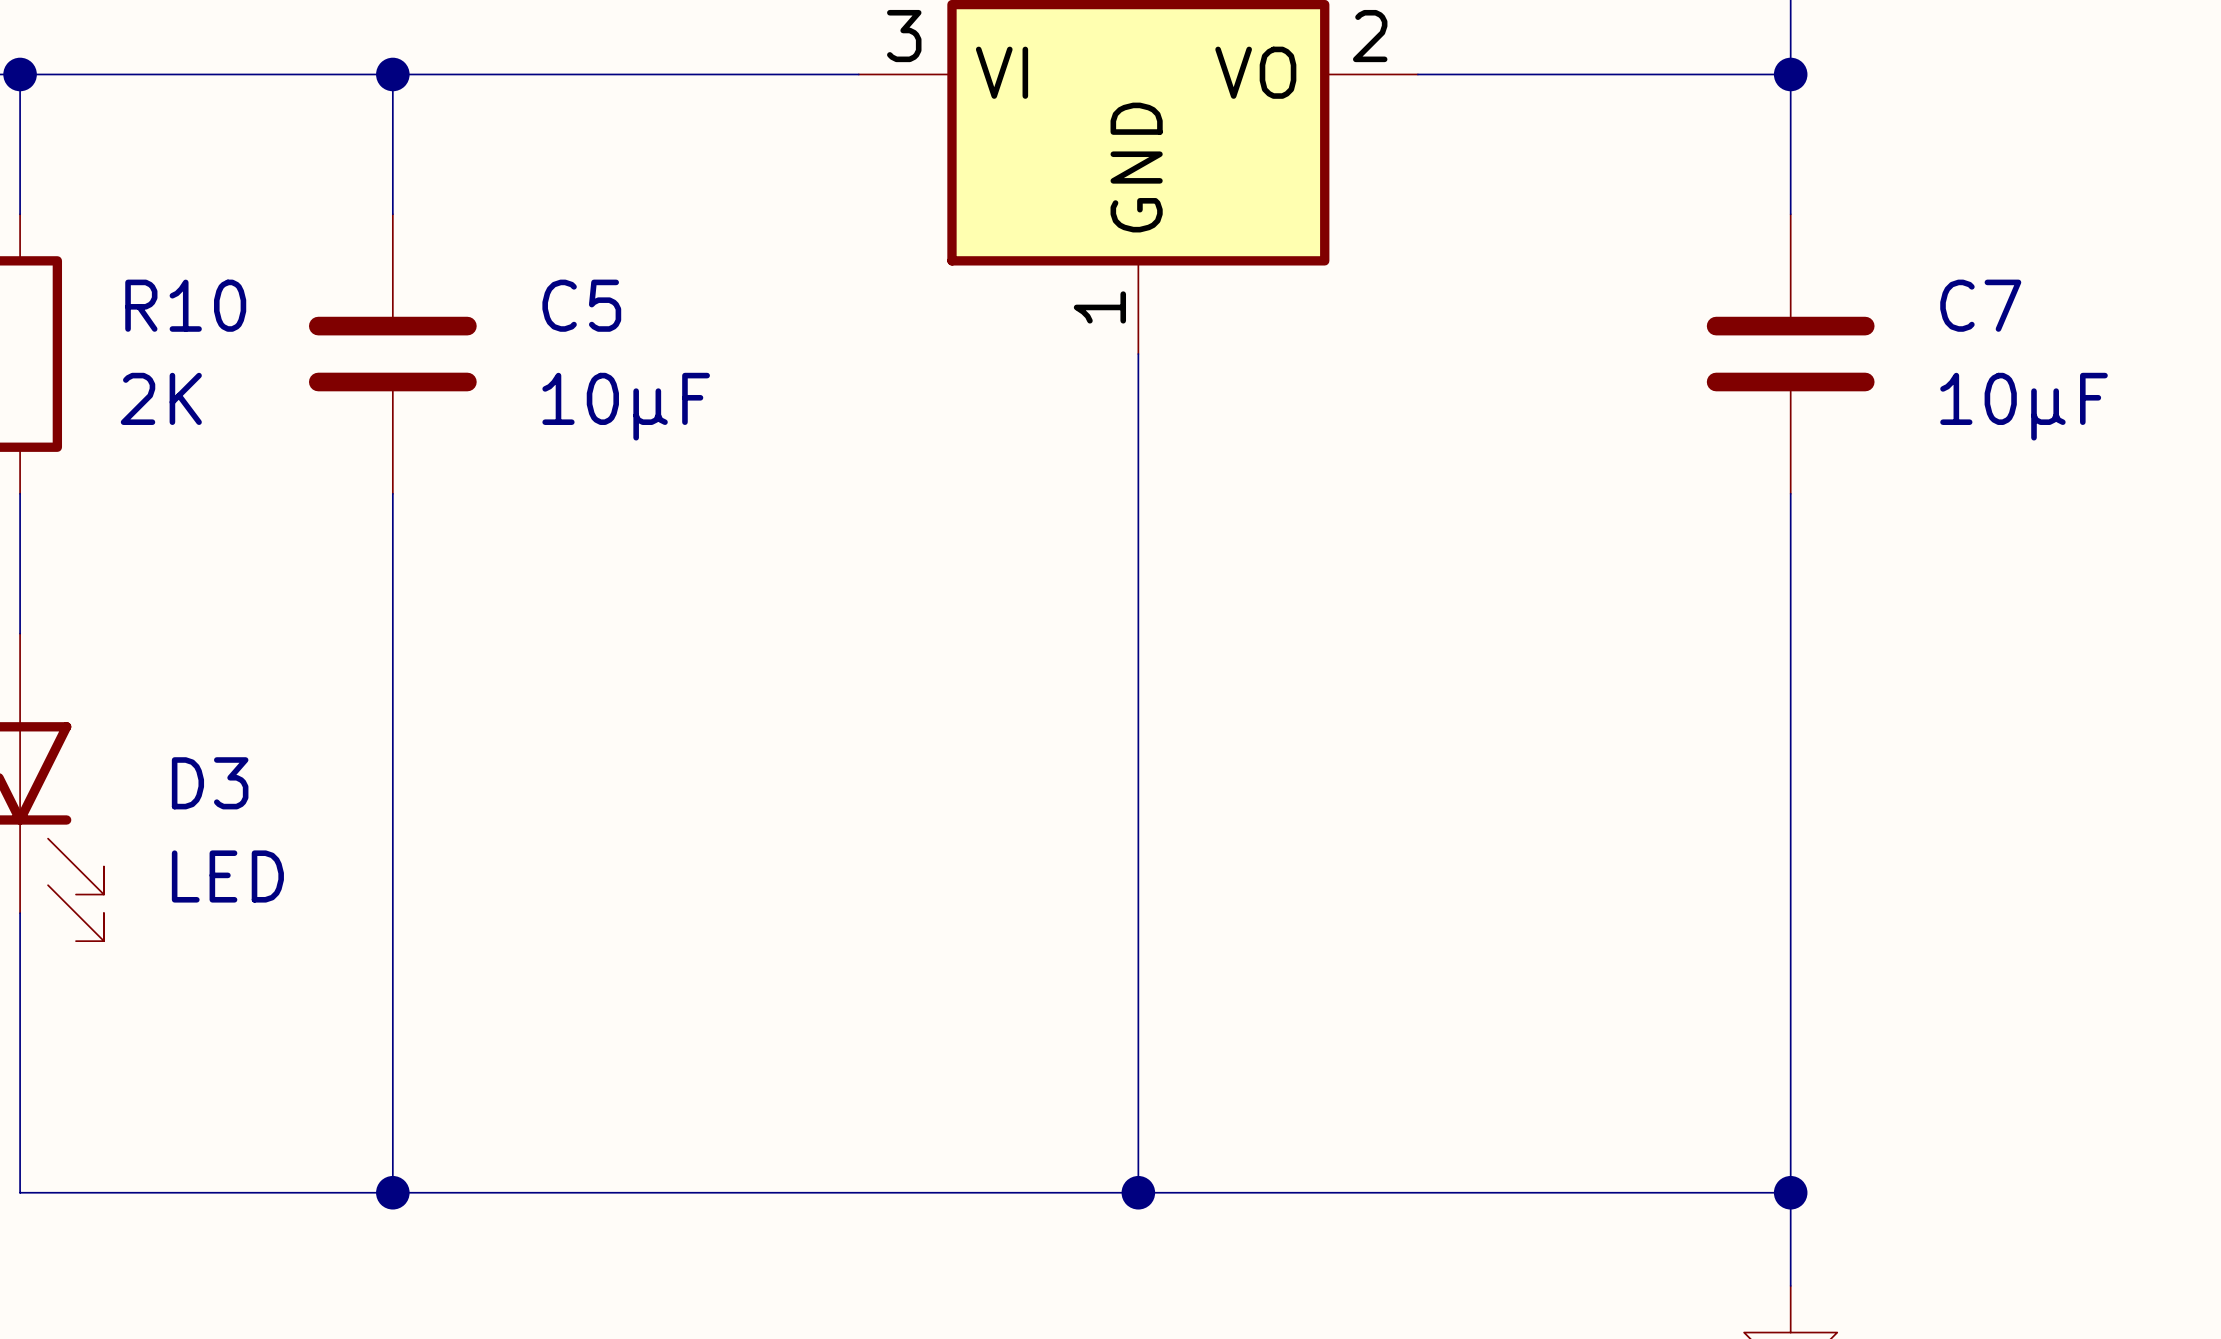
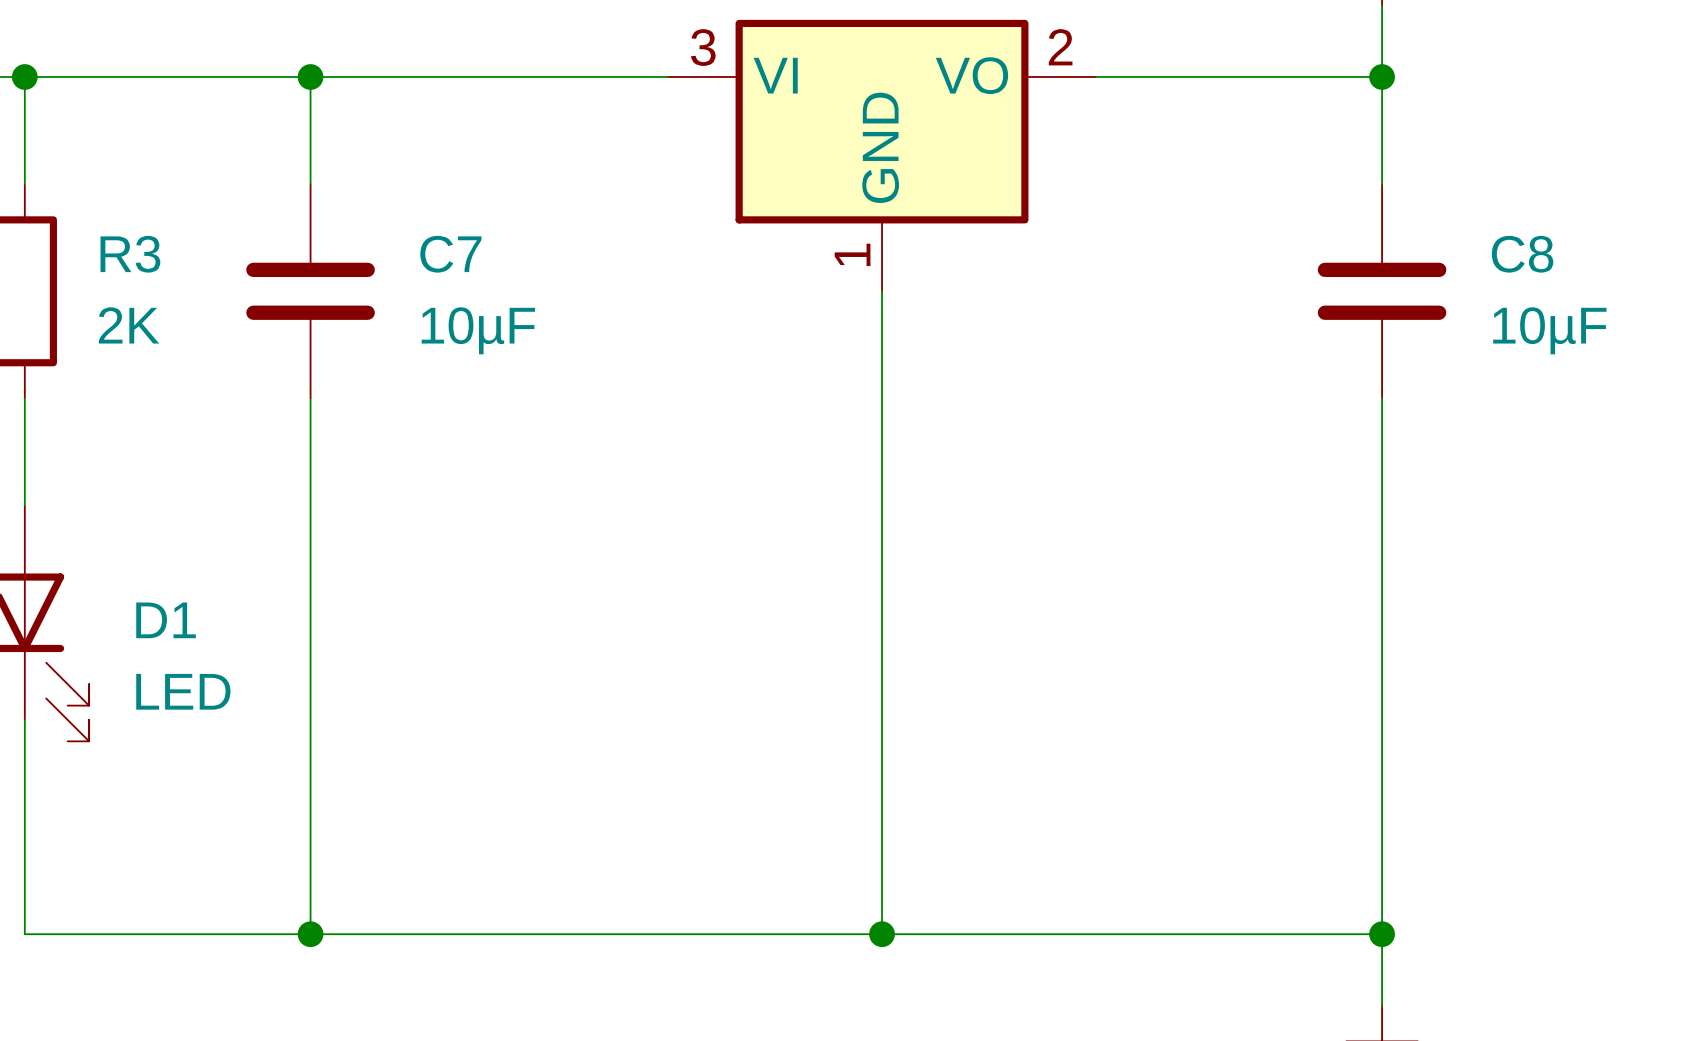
R10 name: R10 (185, 305) -> R3 (130, 254)
C5 name: C5 (581, 305) -> C7 (450, 254)
C7 name: C7 (1980, 305) -> C8 (1522, 254)
D3 name: D3 (210, 783) -> D1 (166, 620)

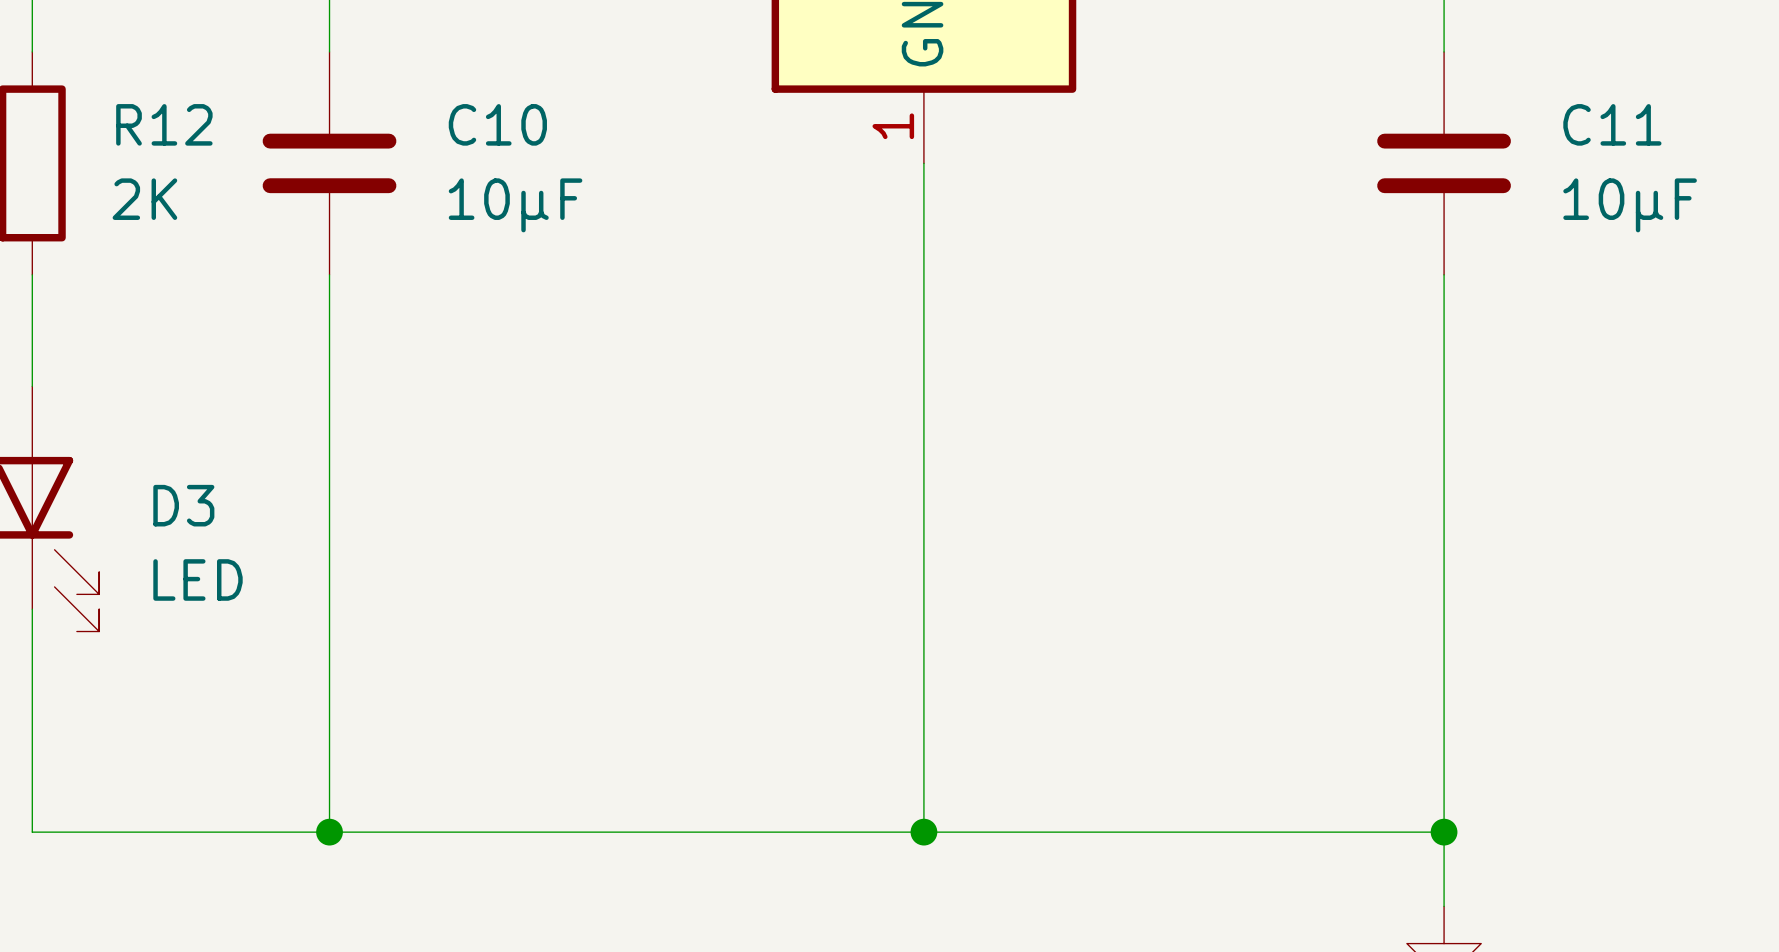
R3 name: R3 (130, 254) -> R12 (164, 124)
C7 name: C7 (450, 254) -> C10 (497, 124)
C8 name: C8 (1522, 254) -> C11 (1612, 124)
D1 name: D1 (166, 620) -> D3 (183, 505)

